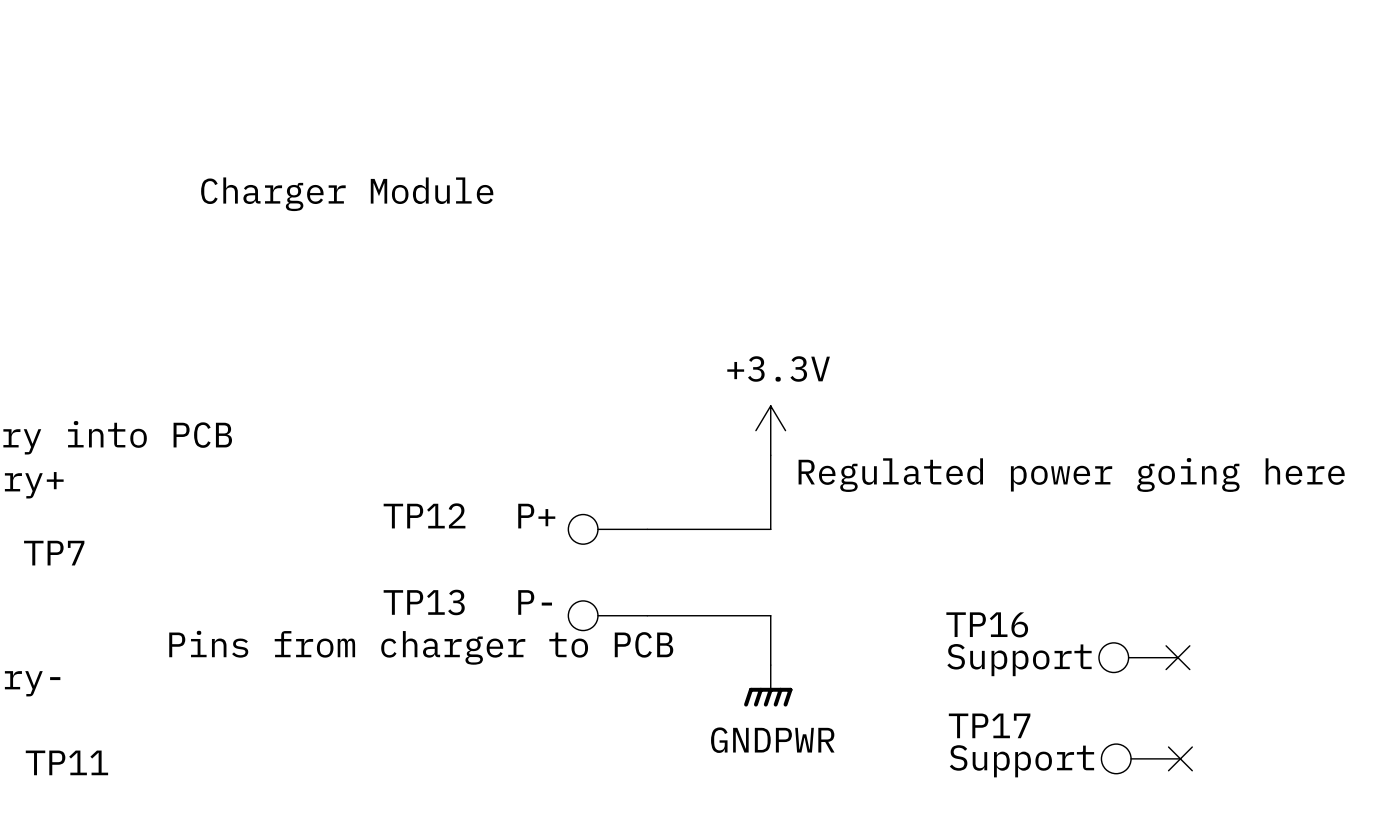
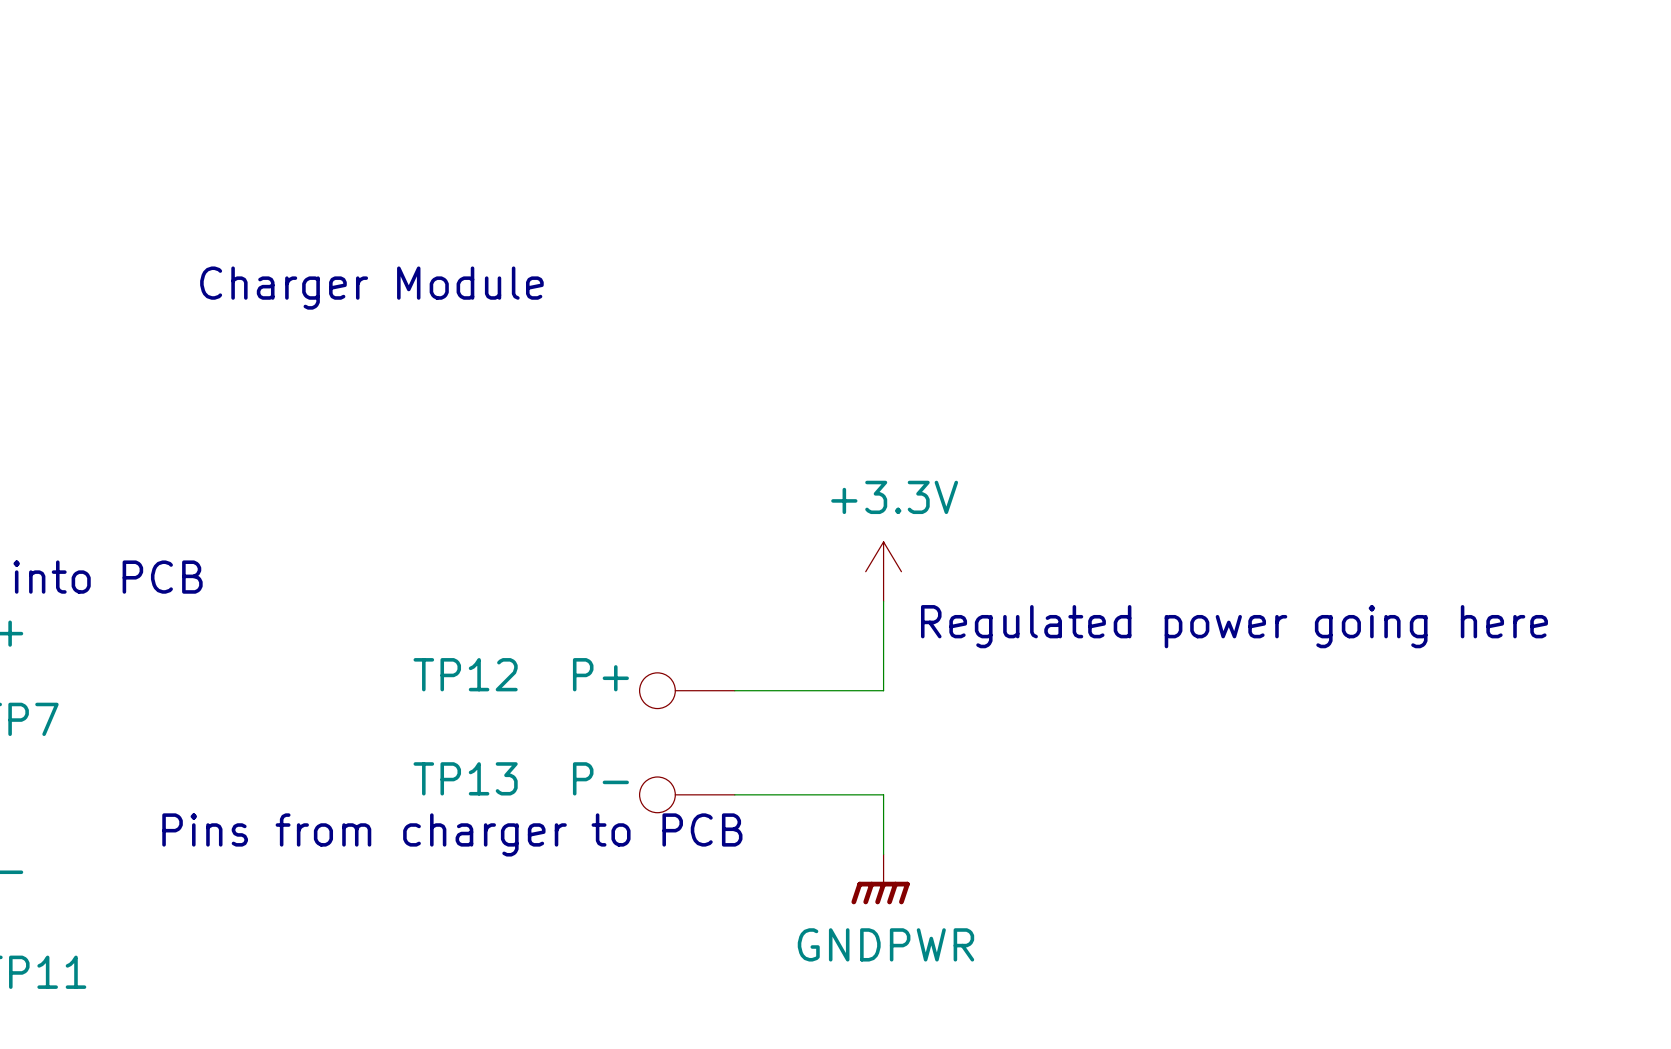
TP16: Support (1138, 657) -> none
no-connect mark: (1177, 657) -> none
TP17: Support (1140, 758) -> none
no-connect mark: (1180, 758) -> none

